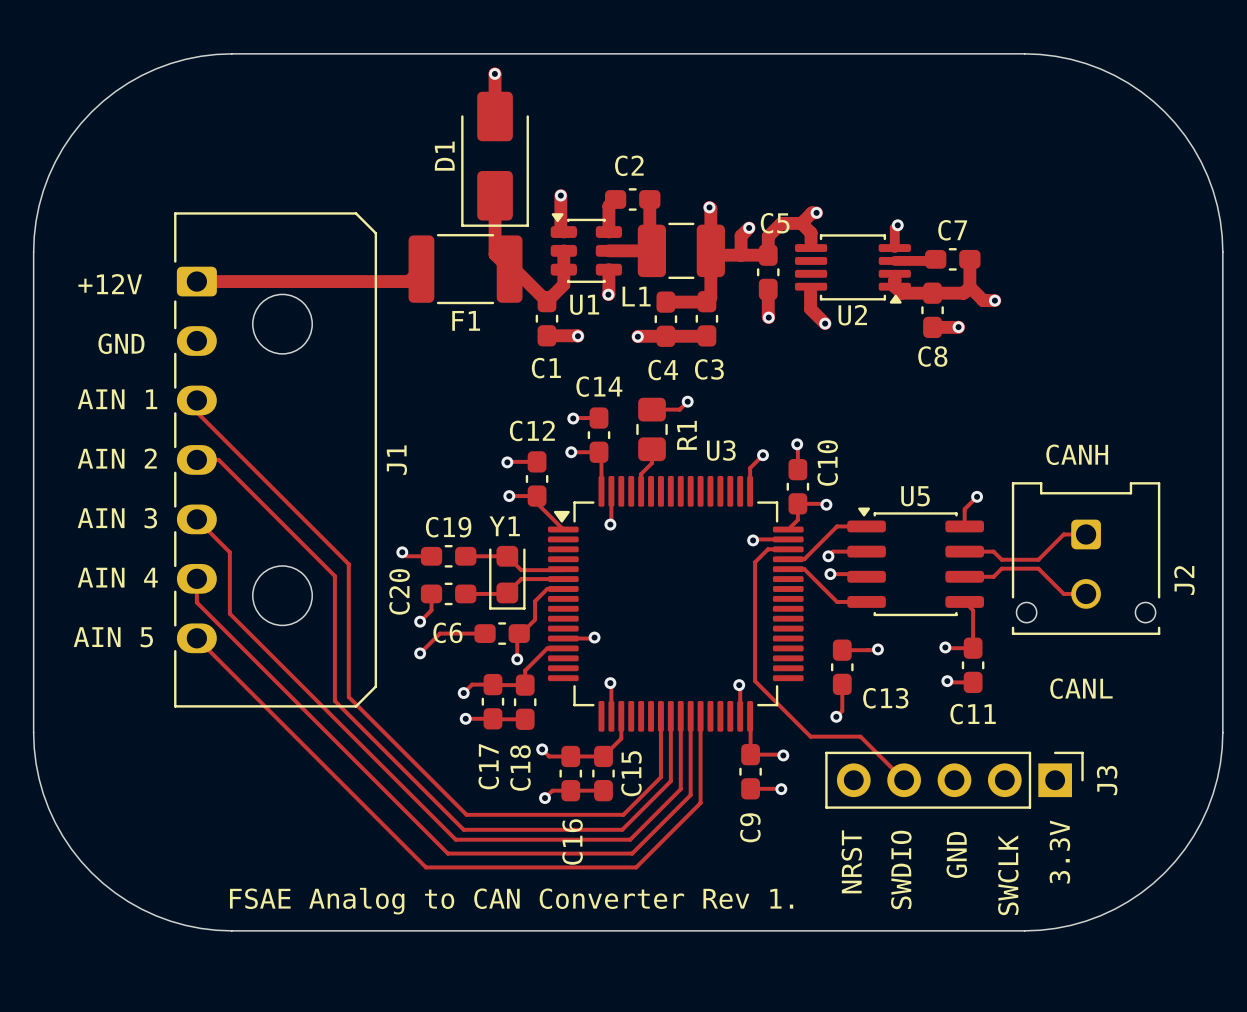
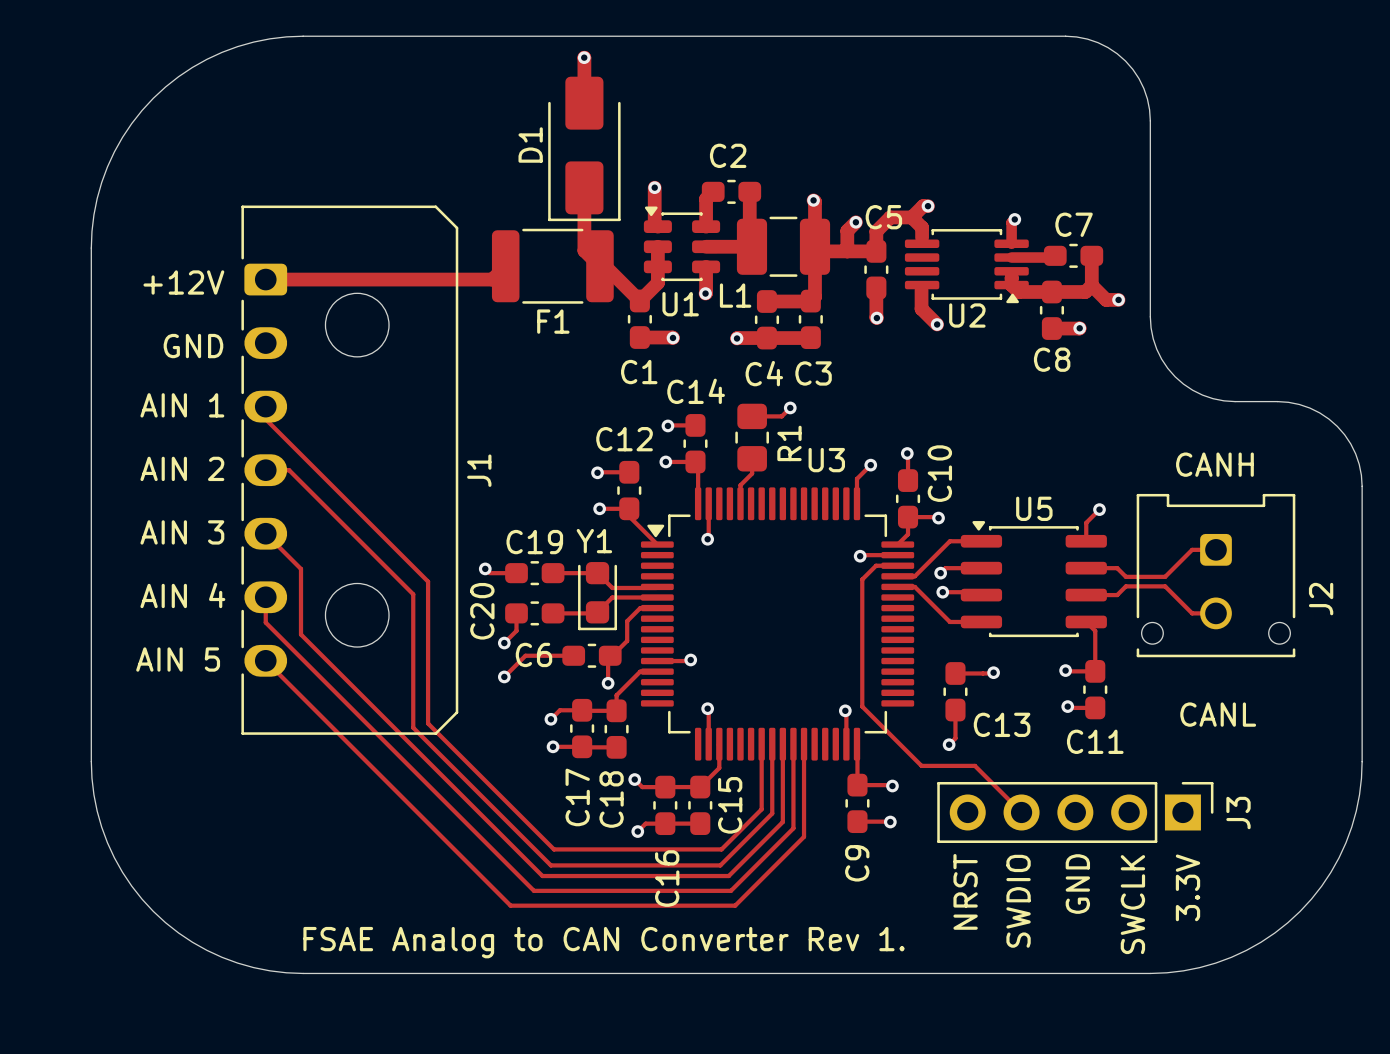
board edge: (945, 53) (1040, 54) (1070, 59) (1100, 68) (1128, 83) (1153, 101) (1175, 123) (1193, 148) (1213, 190) (1222, 236) (1222, 475) -> (1065, 36) (1098, 42) (1117, 53) (1132, 69) (1147, 99) (1150, 120) (1150, 316) (1153, 338) (1161, 359) (1183, 384) (1202, 395) (1223, 400) (1288, 402) (1319, 412) (1337, 426) (1350, 443) (1359, 464) (1362, 486)

